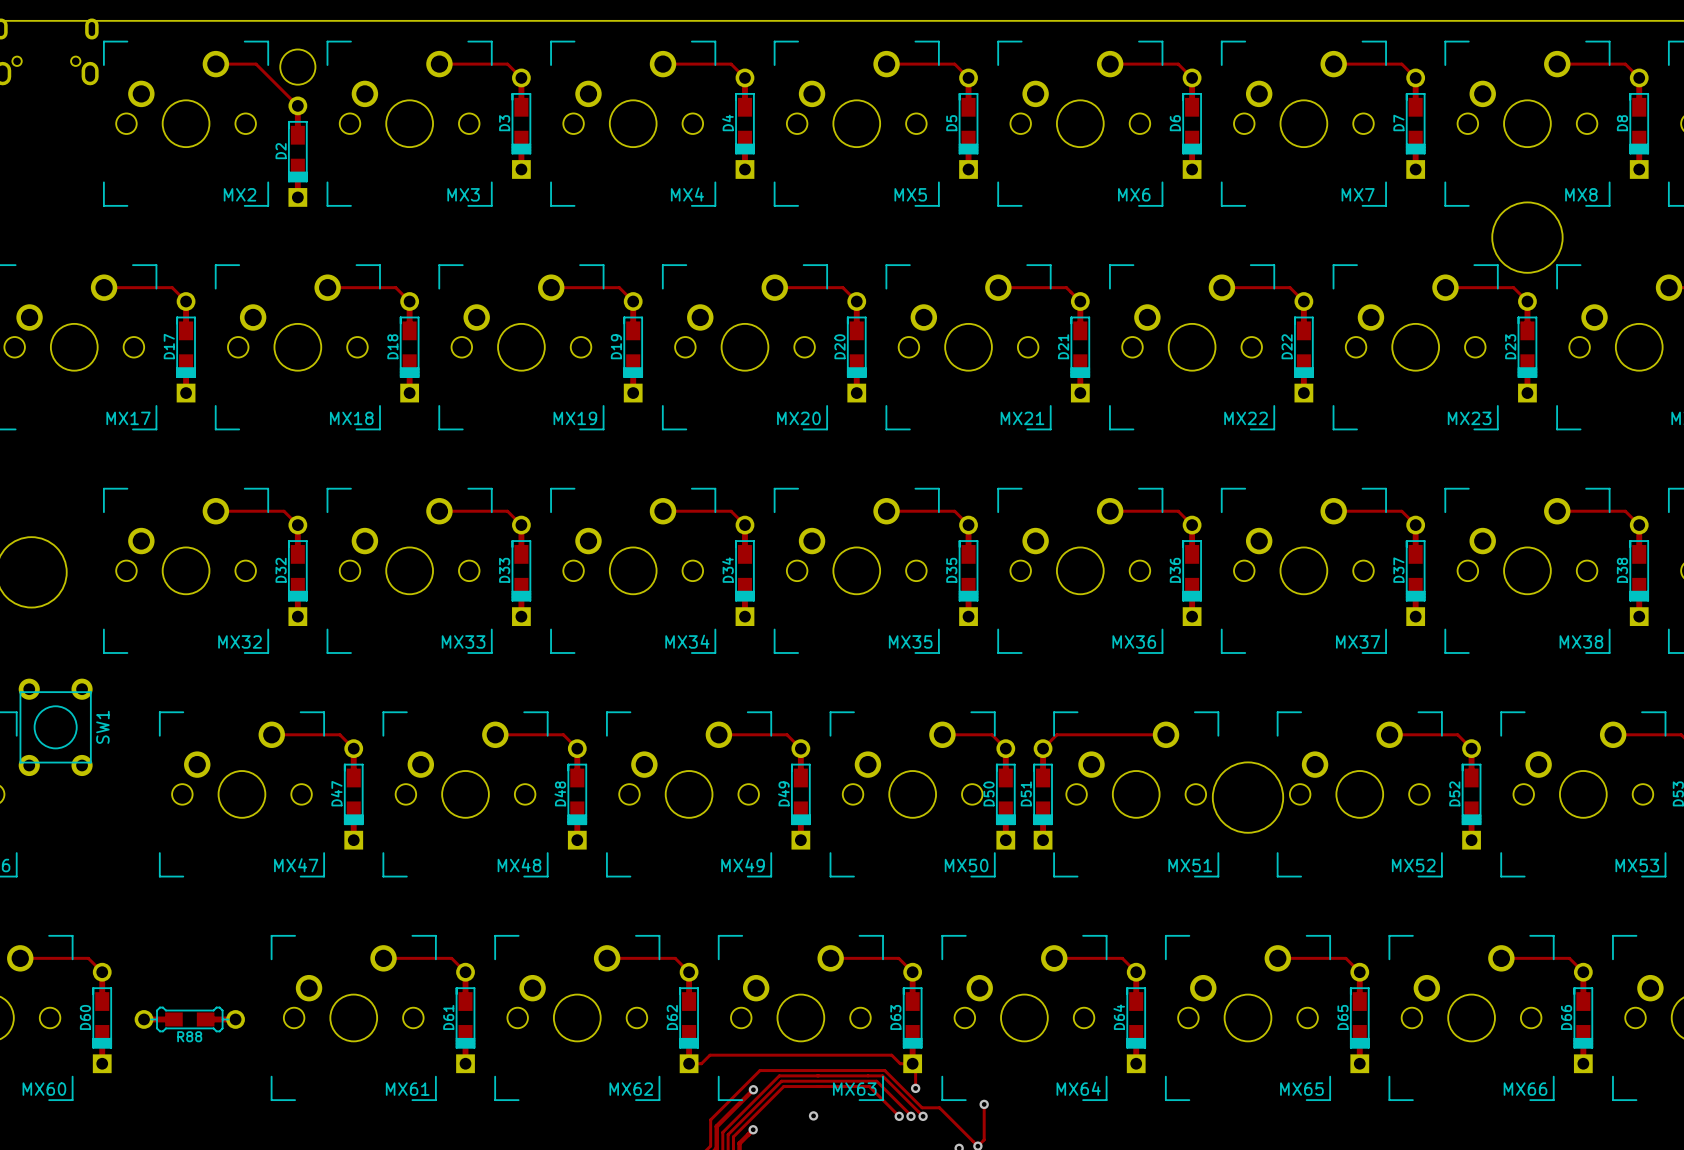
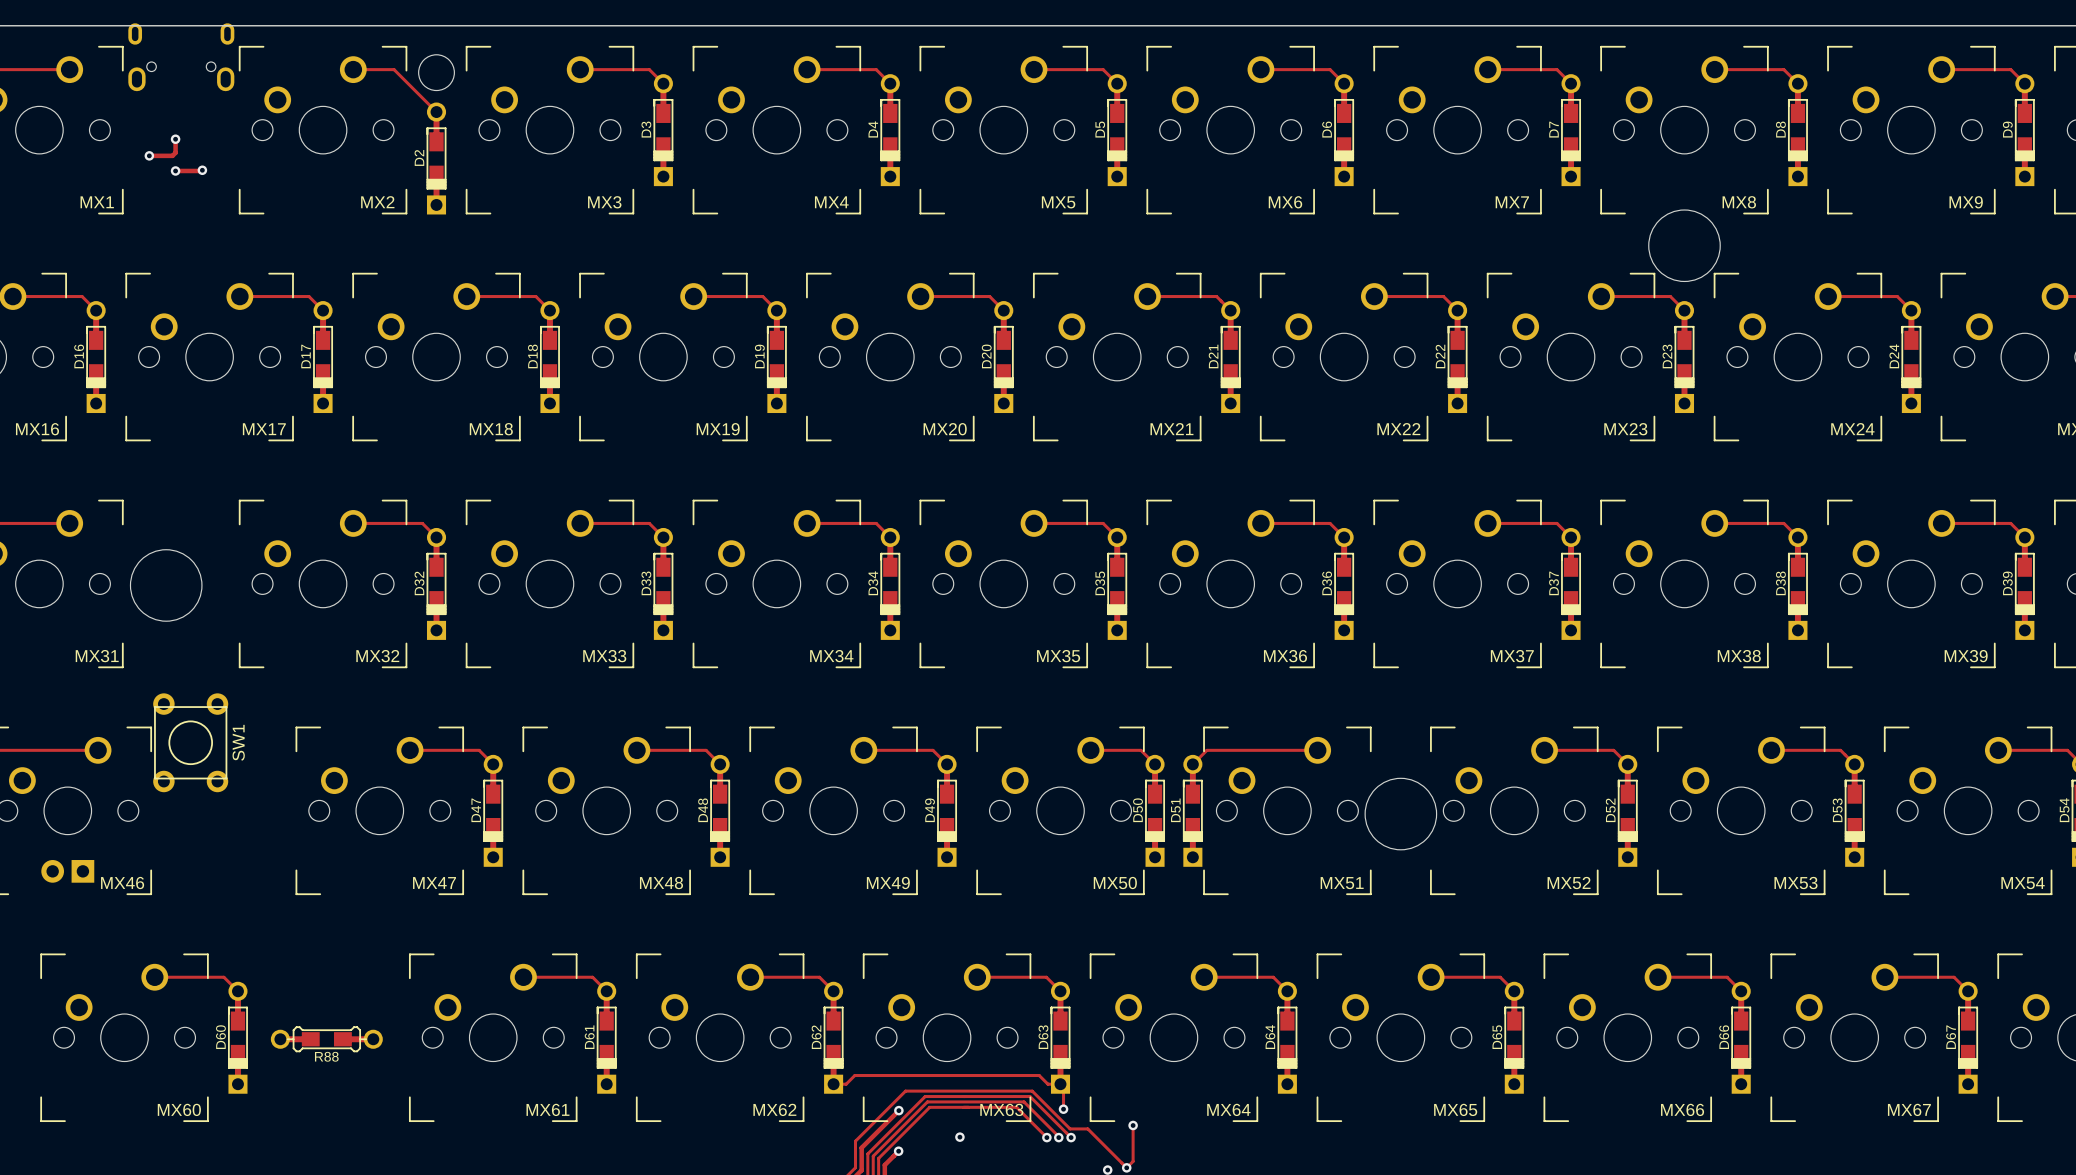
track: none -> (175, 139) (175, 152) (172, 155) (149, 155)
via: none -> (175, 139)
via: none -> (149, 155)
via: none -> (175, 170)
track: none -> (202, 170) (175, 170)
via: none -> (202, 170)

